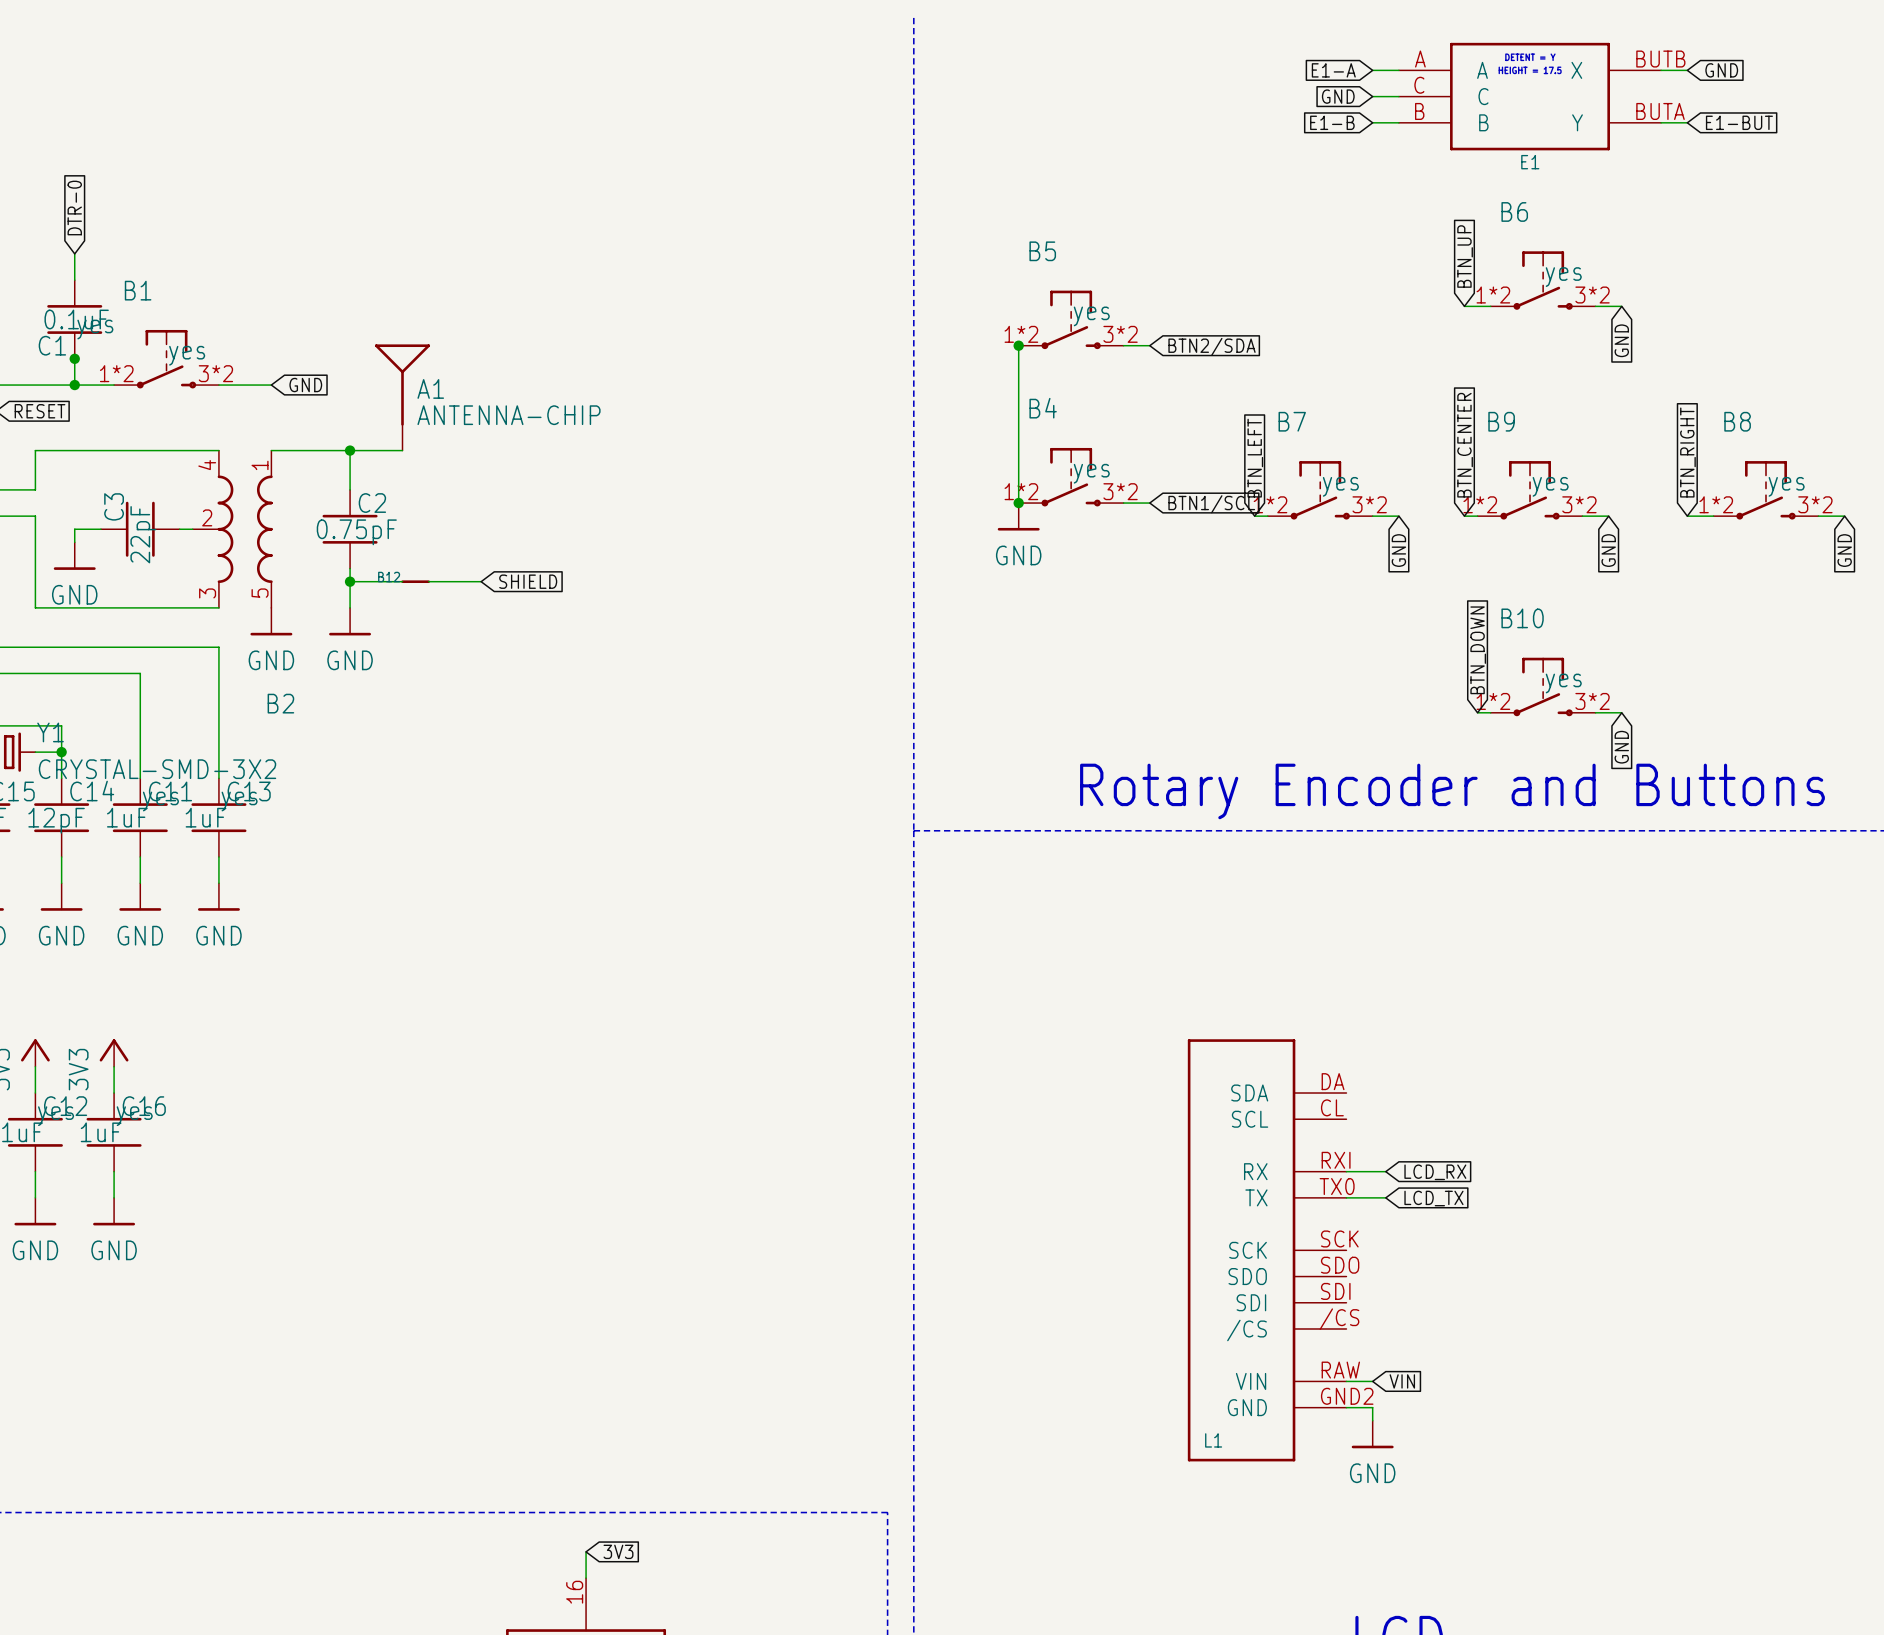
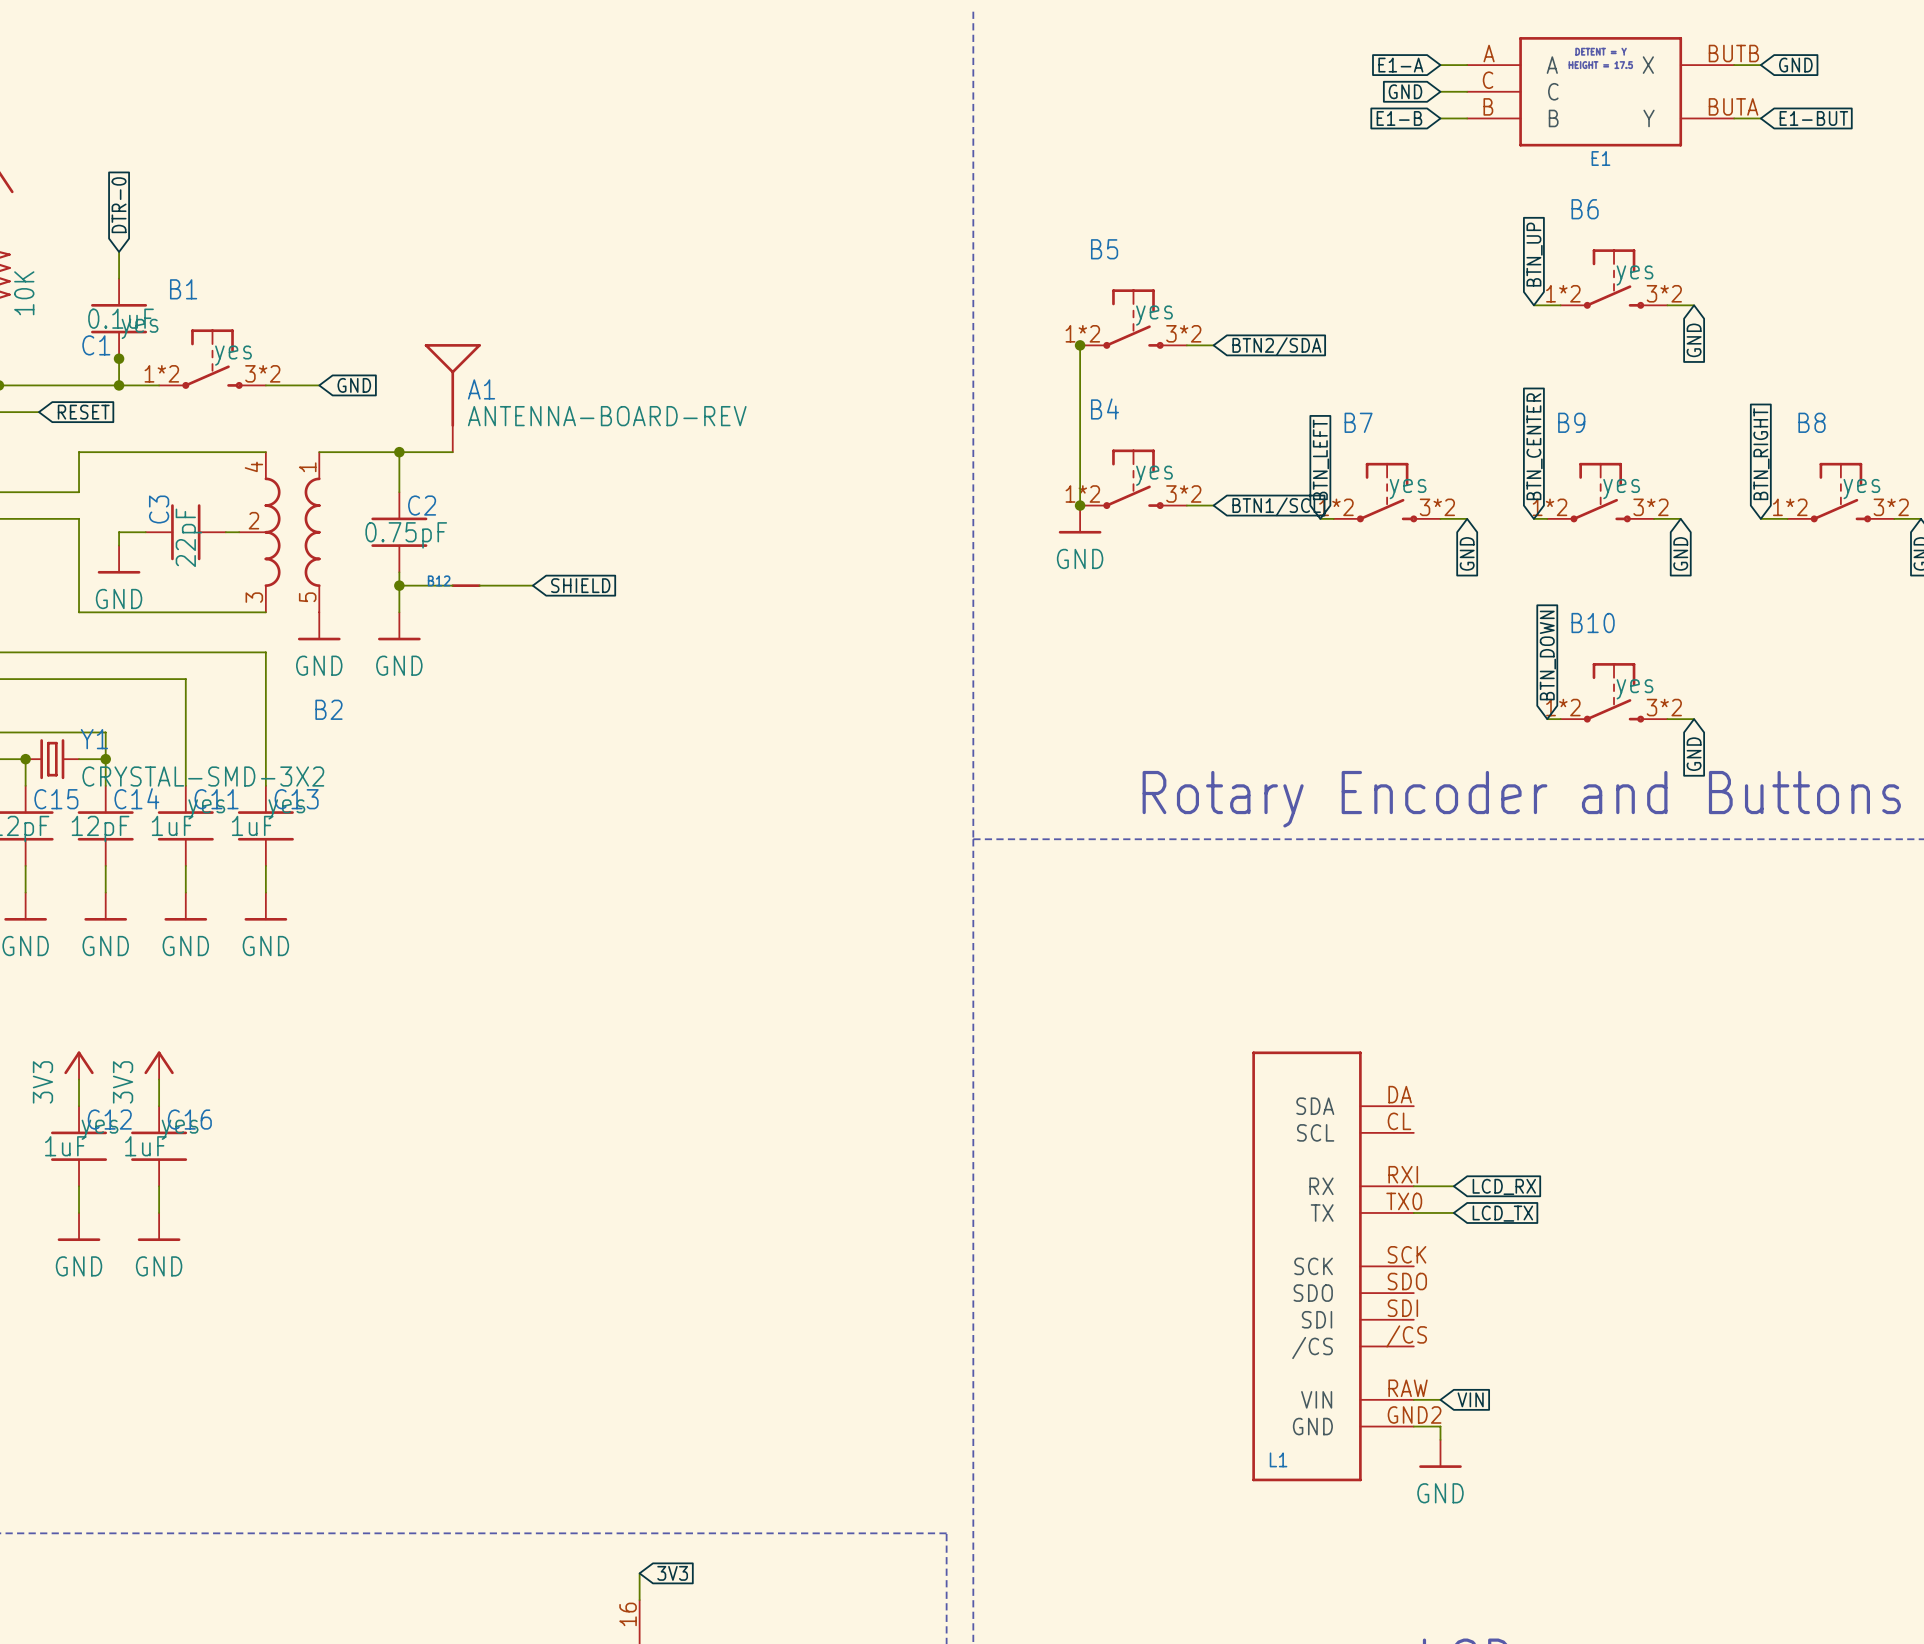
A1 value: ANTENNA-CHIP (509, 415) -> ANTENNA-BOARD-REV (607, 416)

